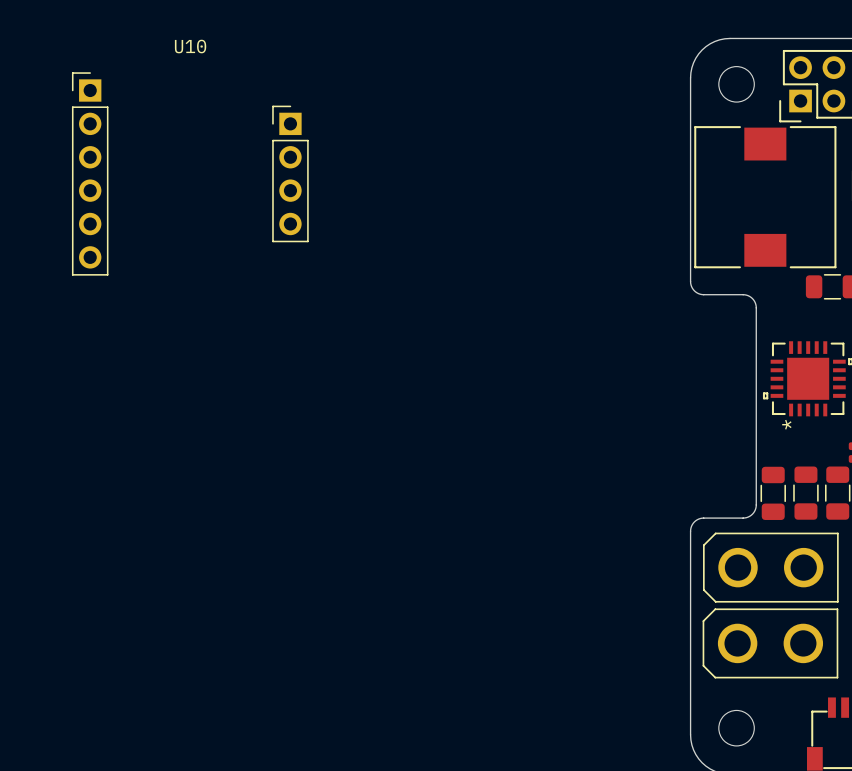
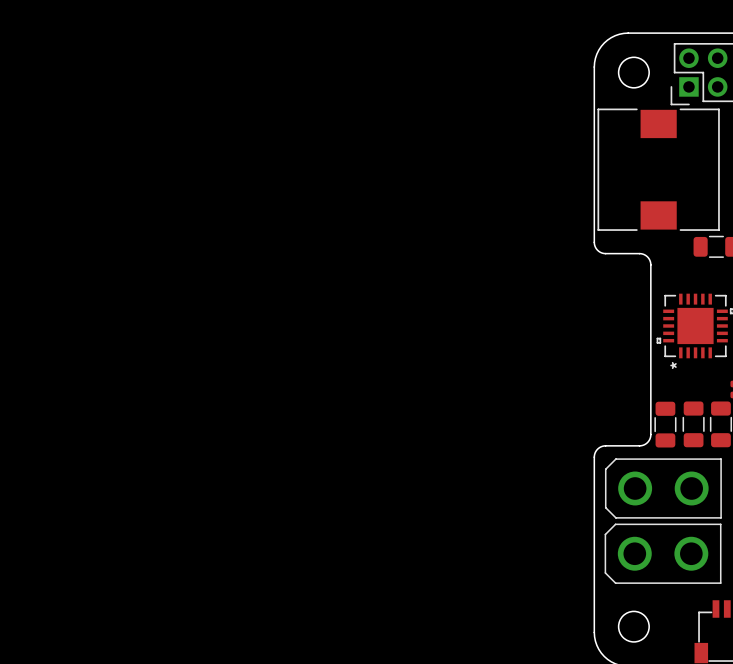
U10: (190, 173) -> none

